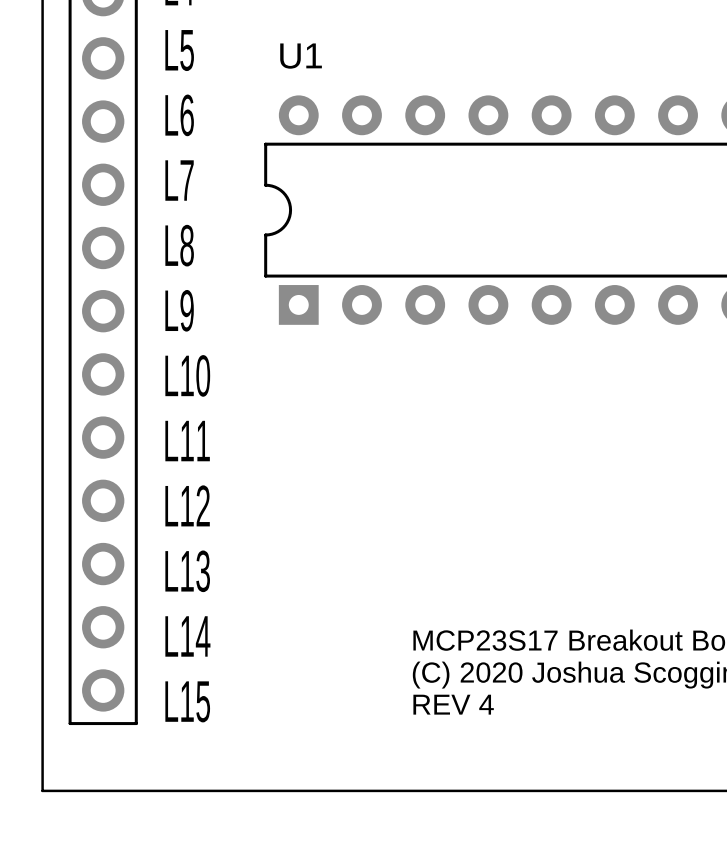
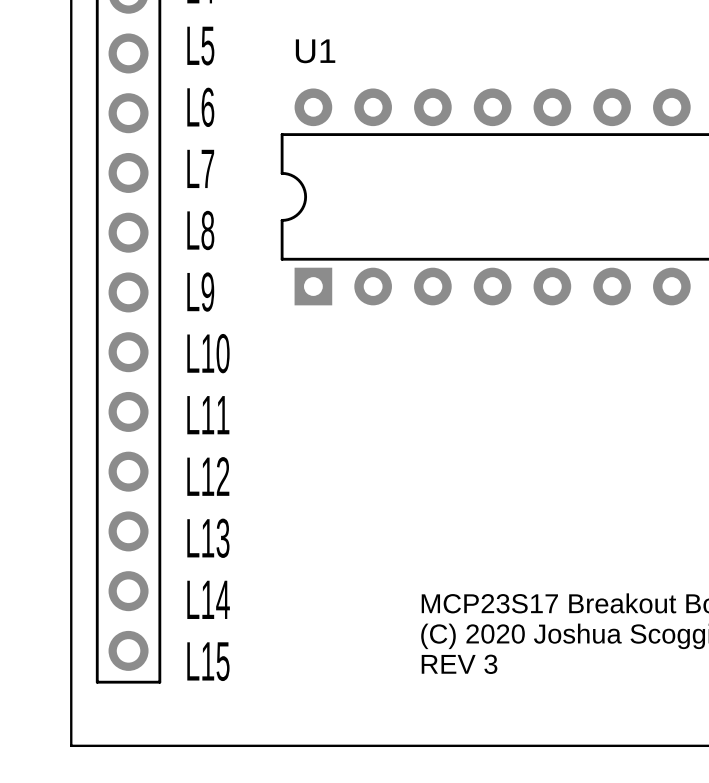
text: REV 4 (453, 704) -> REV 3 (459, 664)

